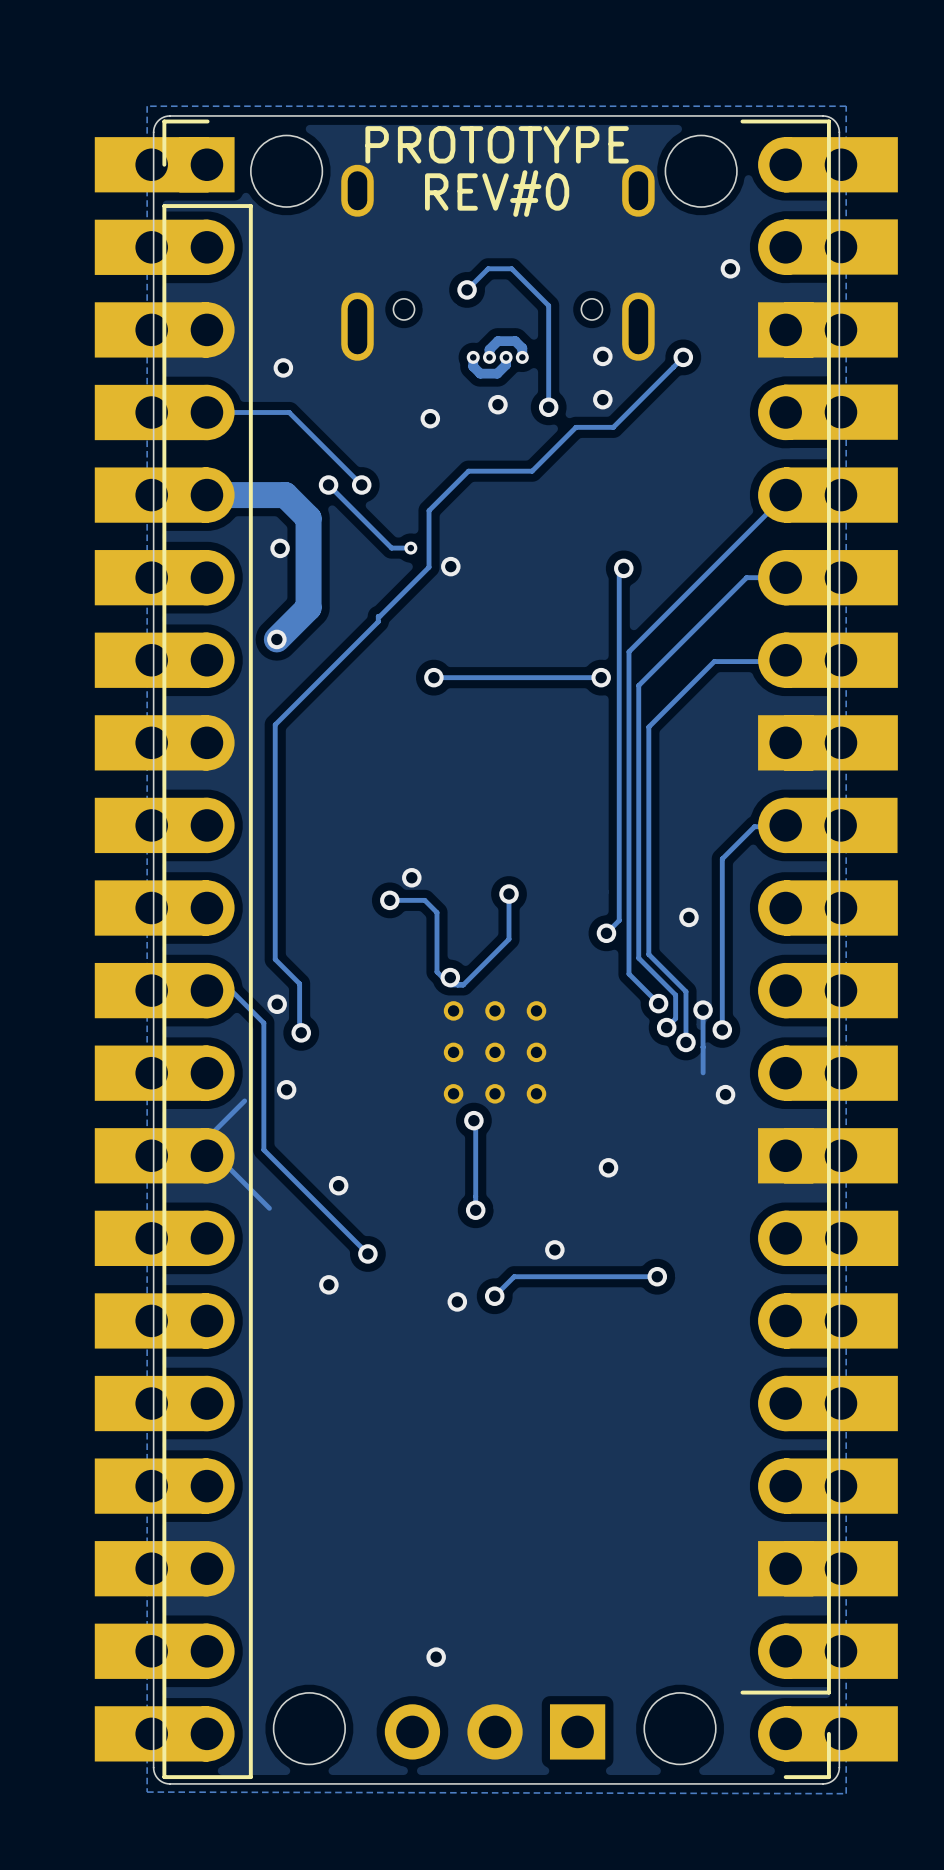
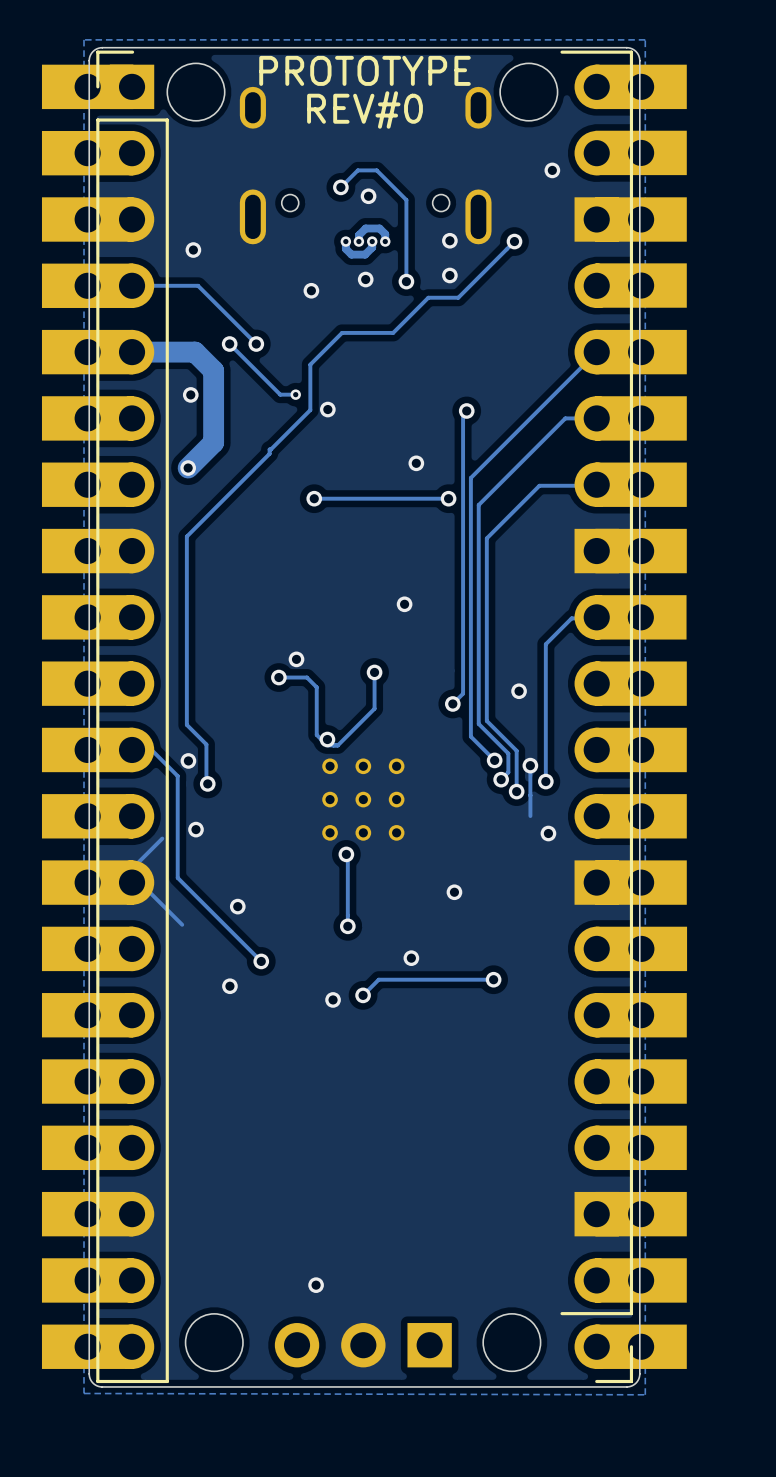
via: none -> (368, 196)
via: none -> (416, 463)
via: none -> (404, 604)

